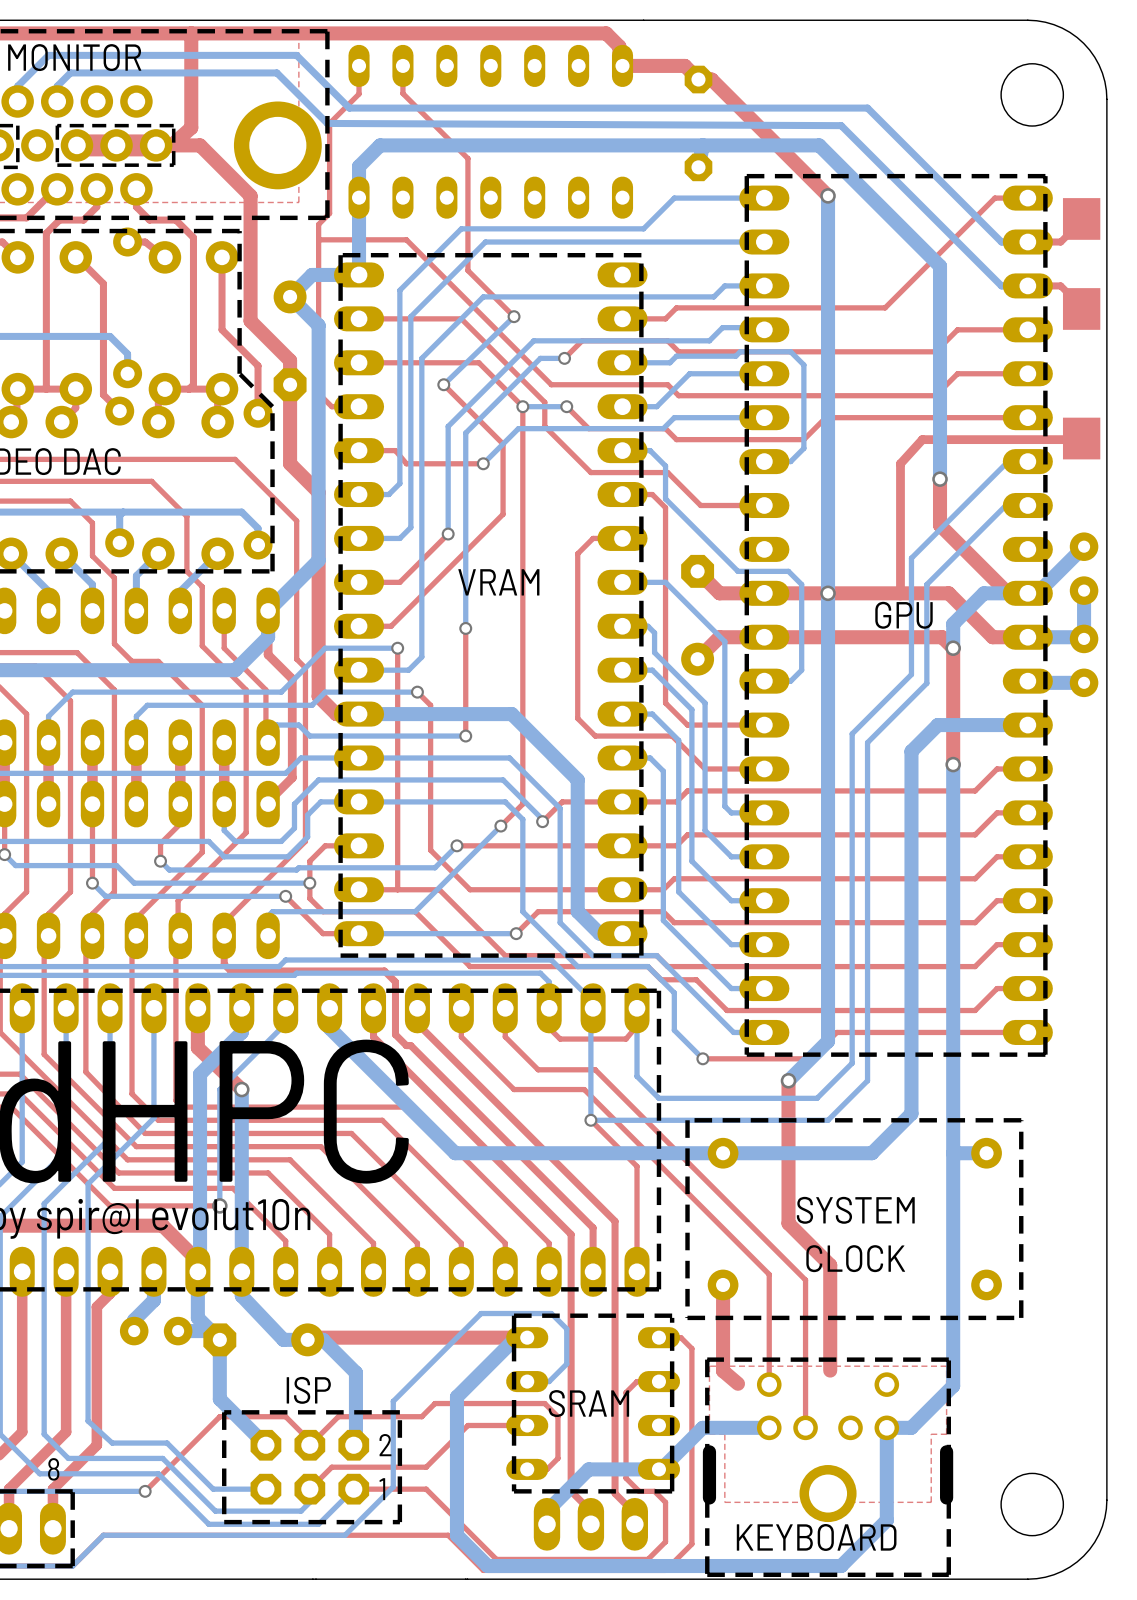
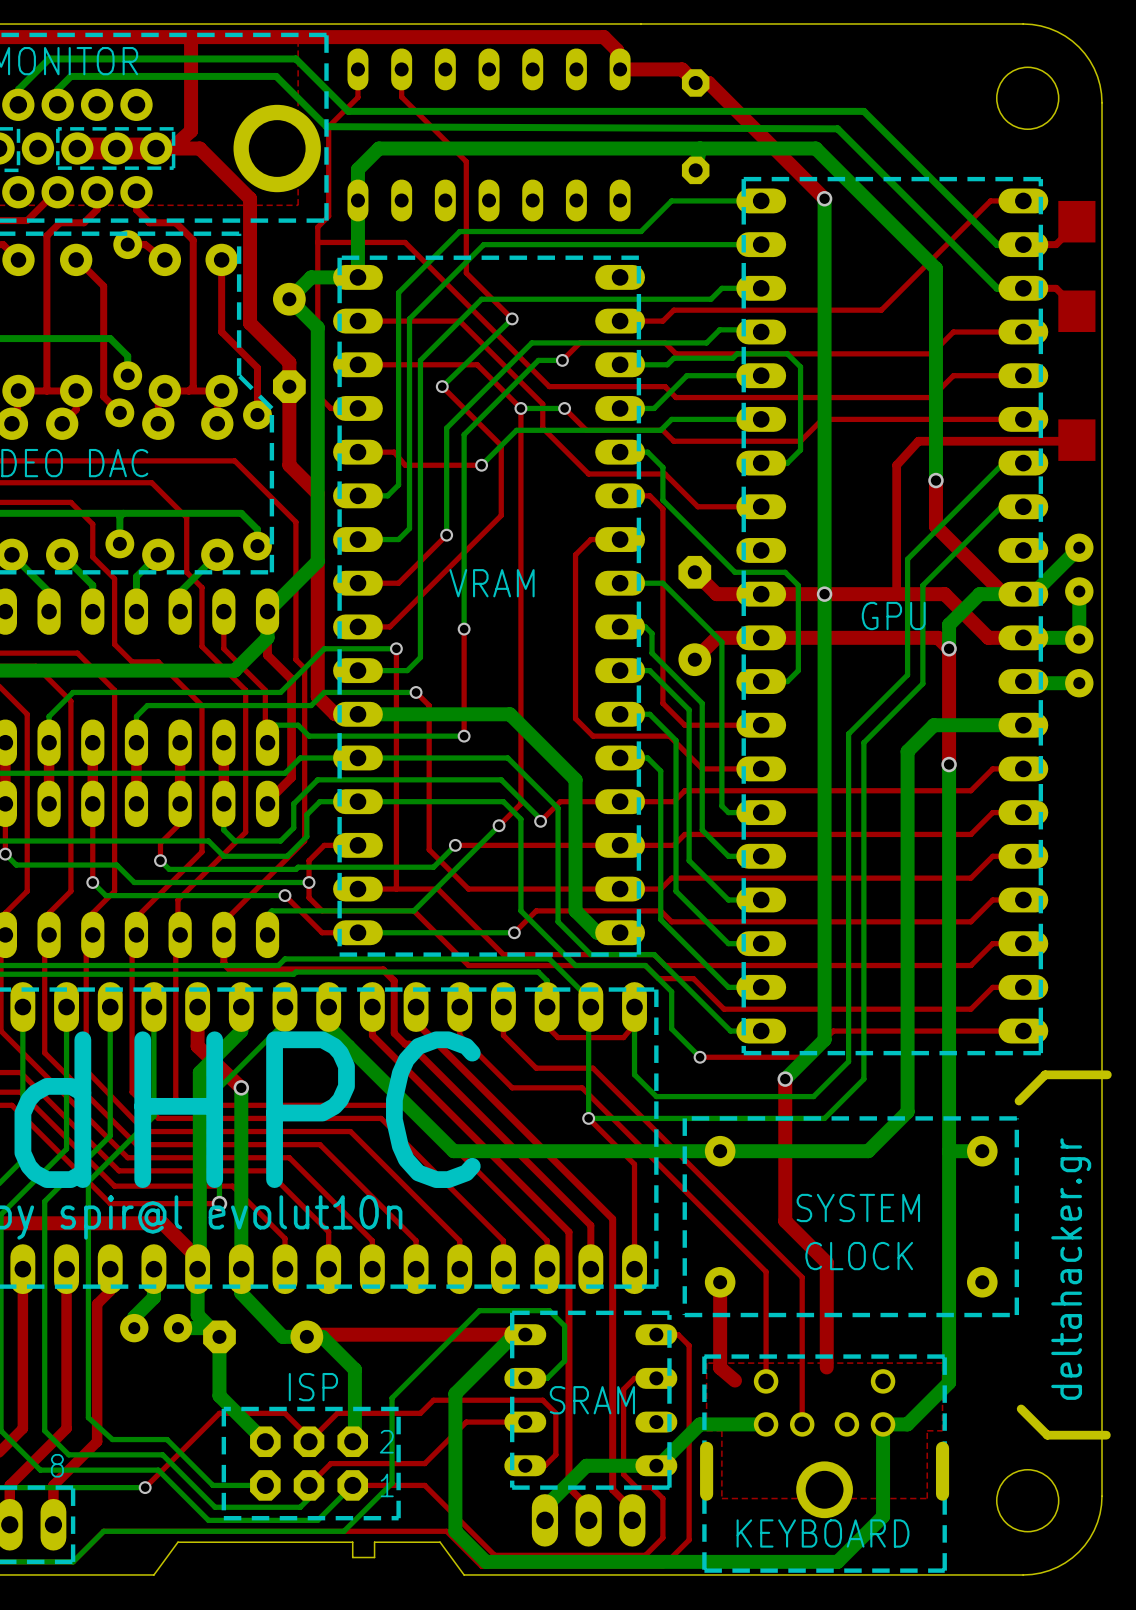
board edge: none -> (1107, 1074) (1045, 1074) (1019, 1101)
text: none -> deltahacker.gr (1071, 1269)
board edge: none -> (1021, 1408) (1047, 1435) (1106, 1435)
board edge: (465, 1579) (153, 1579) -> (464, 1574) (440, 1542) (374, 1542) (374, 1557) (352, 1557) (352, 1542) (177, 1542) (153, 1574)

